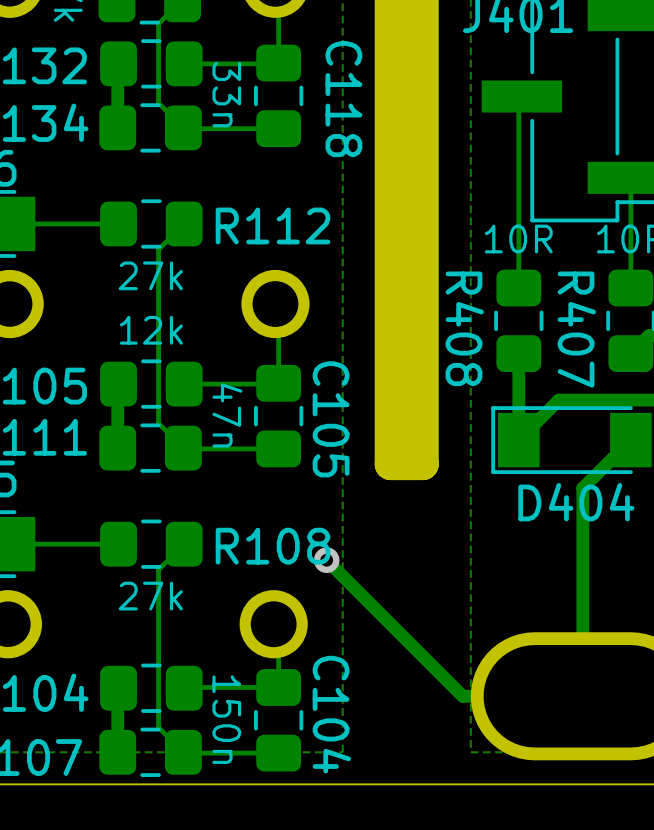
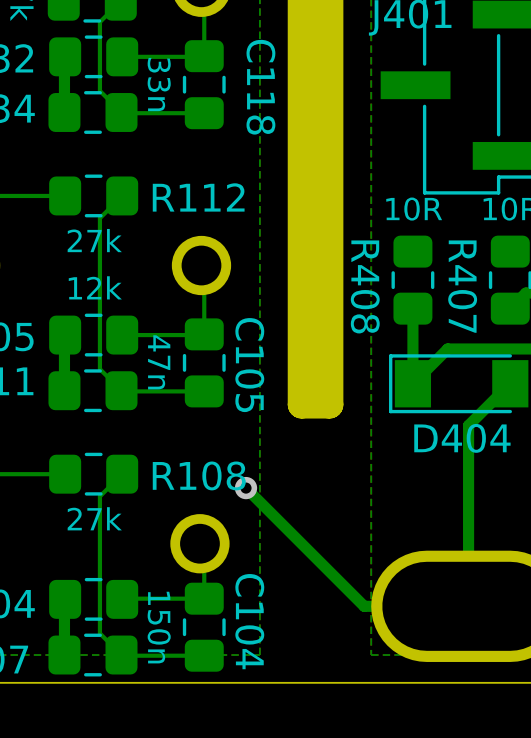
bottom track: (521, 96) (518, 99) (518, 288) -> none
bottom track: (627, 177) (630, 180) (630, 288) -> none

